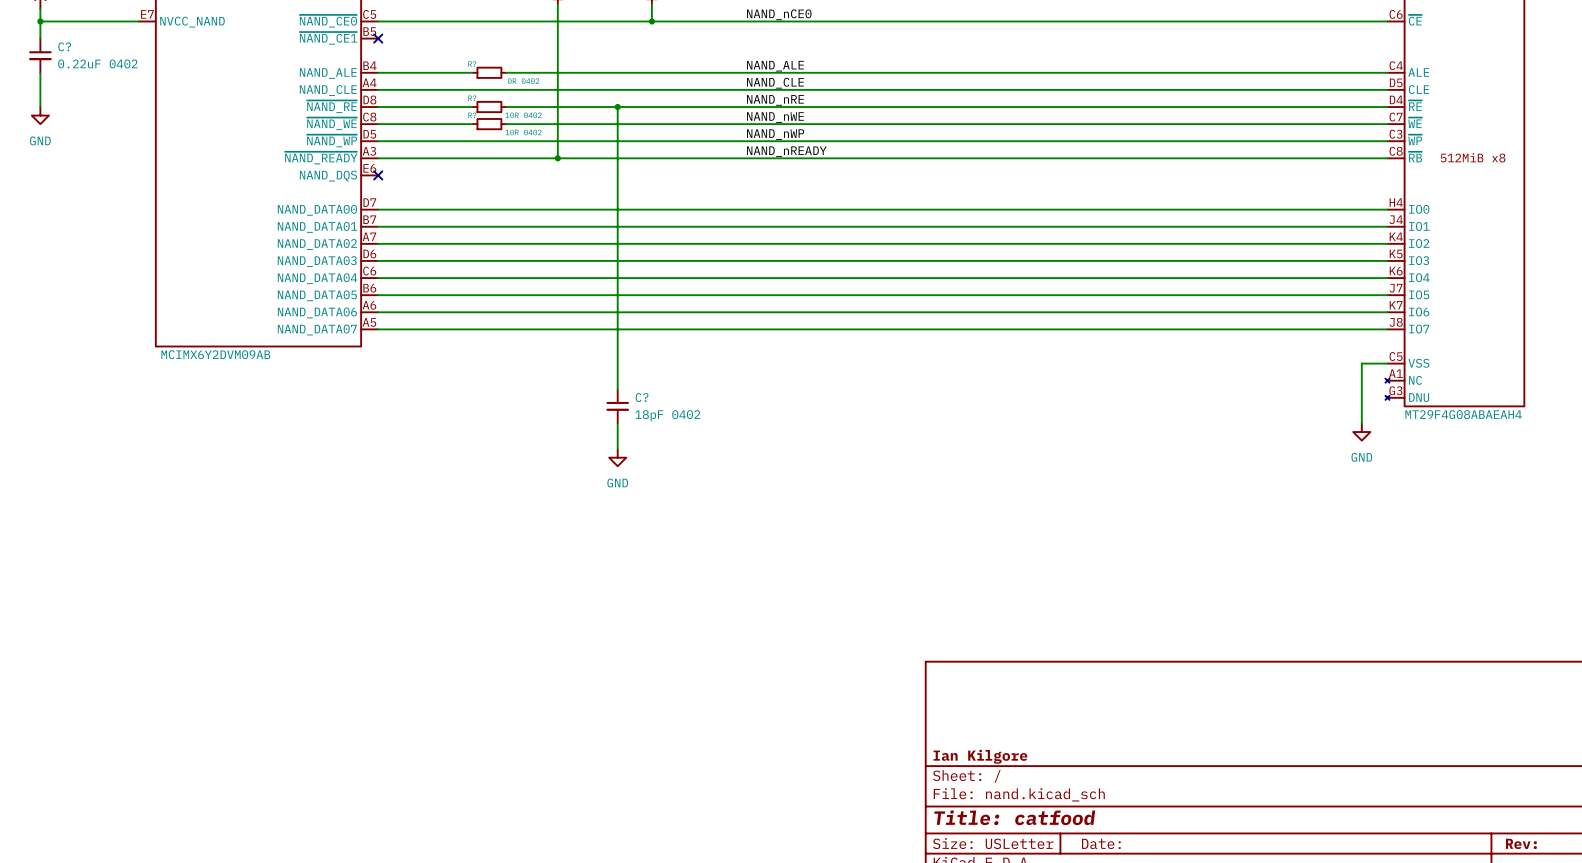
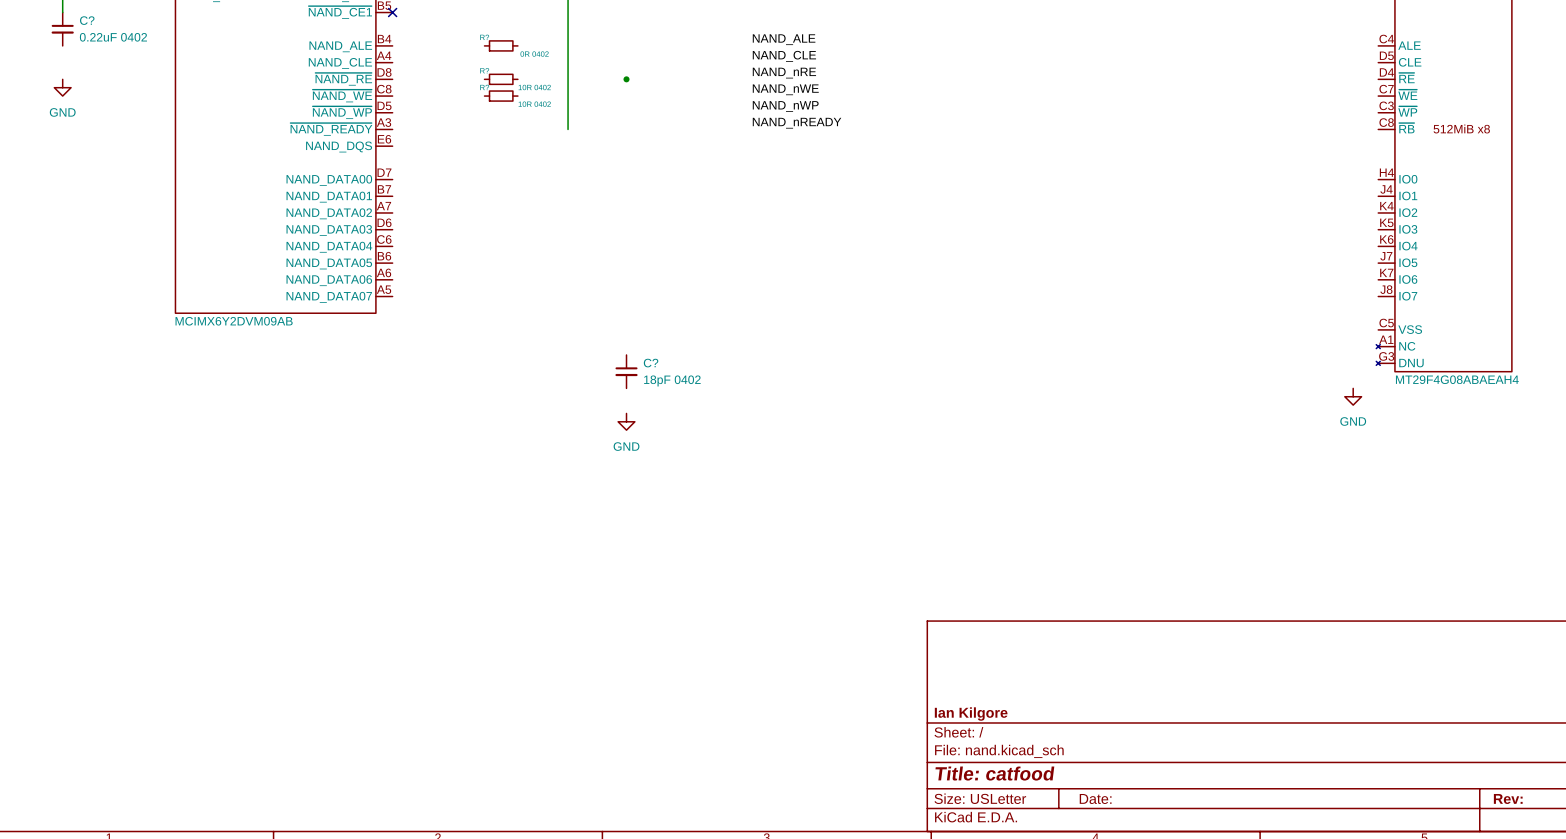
wire: (40, 72) (40, 107) -> none
wire: (378, 72) (472, 72) -> none
wire: (506, 72) (1387, 72) -> none
wire: (378, 89) (1387, 89) -> none
wire: (378, 107) (472, 107) -> none
wire: (506, 107) (1387, 107) -> none
wire: (617, 107) (617, 389) -> none
wire: (378, 124) (472, 124) -> none
wire: (506, 124) (1387, 124) -> none
wire: (378, 141) (1387, 141) -> none
wire: (378, 158) (1387, 158) -> none
junction: (557, 158) -> none
no-connect mark: (378, 175) -> none
wire: (378, 209) (1387, 209) -> none
wire: (378, 226) (1387, 226) -> none
wire: (378, 243) (1387, 243) -> none
wire: (378, 260) (1387, 260) -> none
wire: (378, 278) (1387, 278) -> none
wire: (378, 295) (1387, 295) -> none
wire: (378, 312) (1387, 312) -> none
wire: (378, 329) (1387, 329) -> none
wire: (1387, 363) (1361, 363) (1361, 423) -> none
wire: (617, 423) (617, 449) -> none

